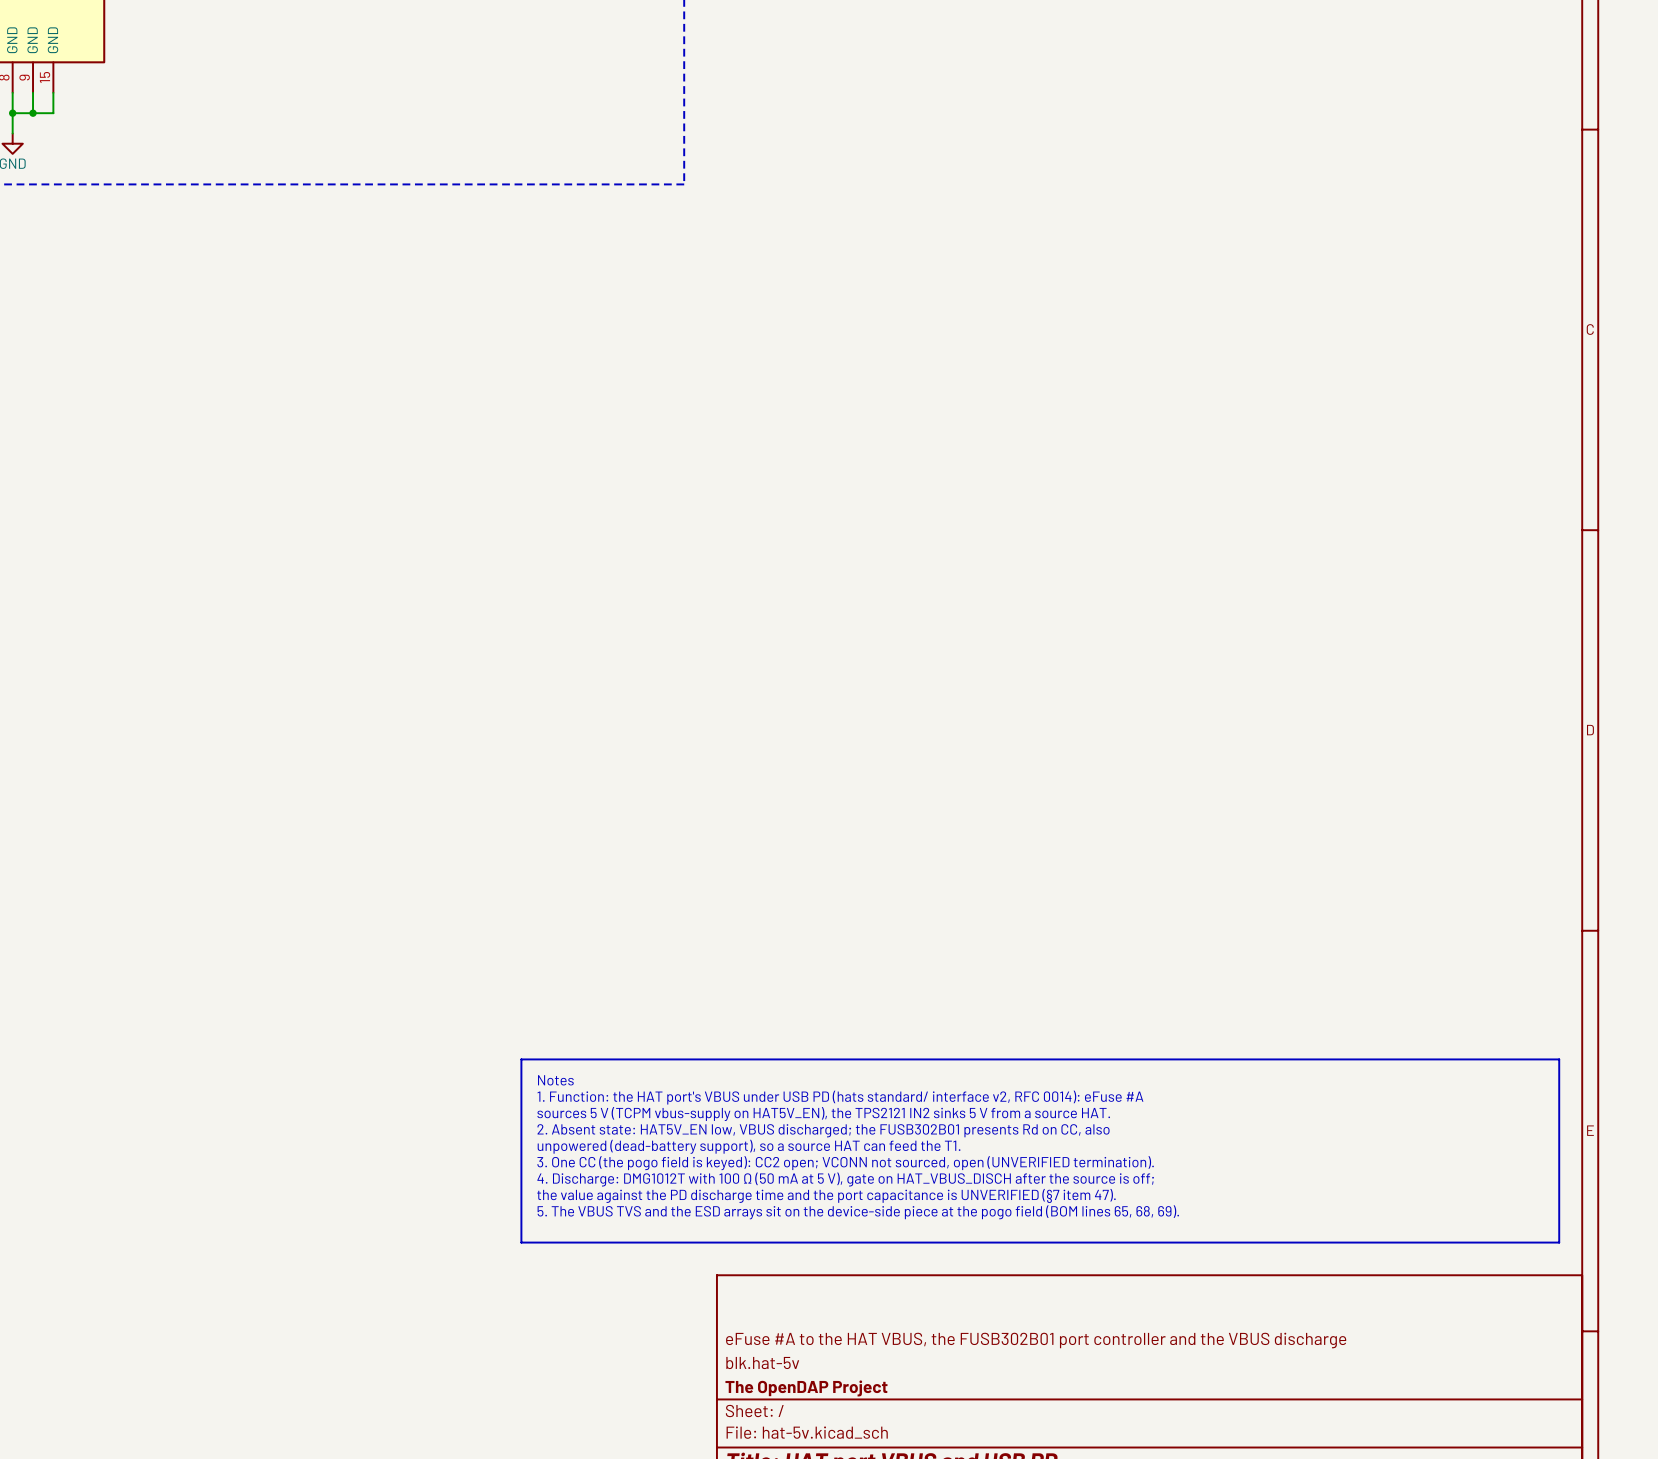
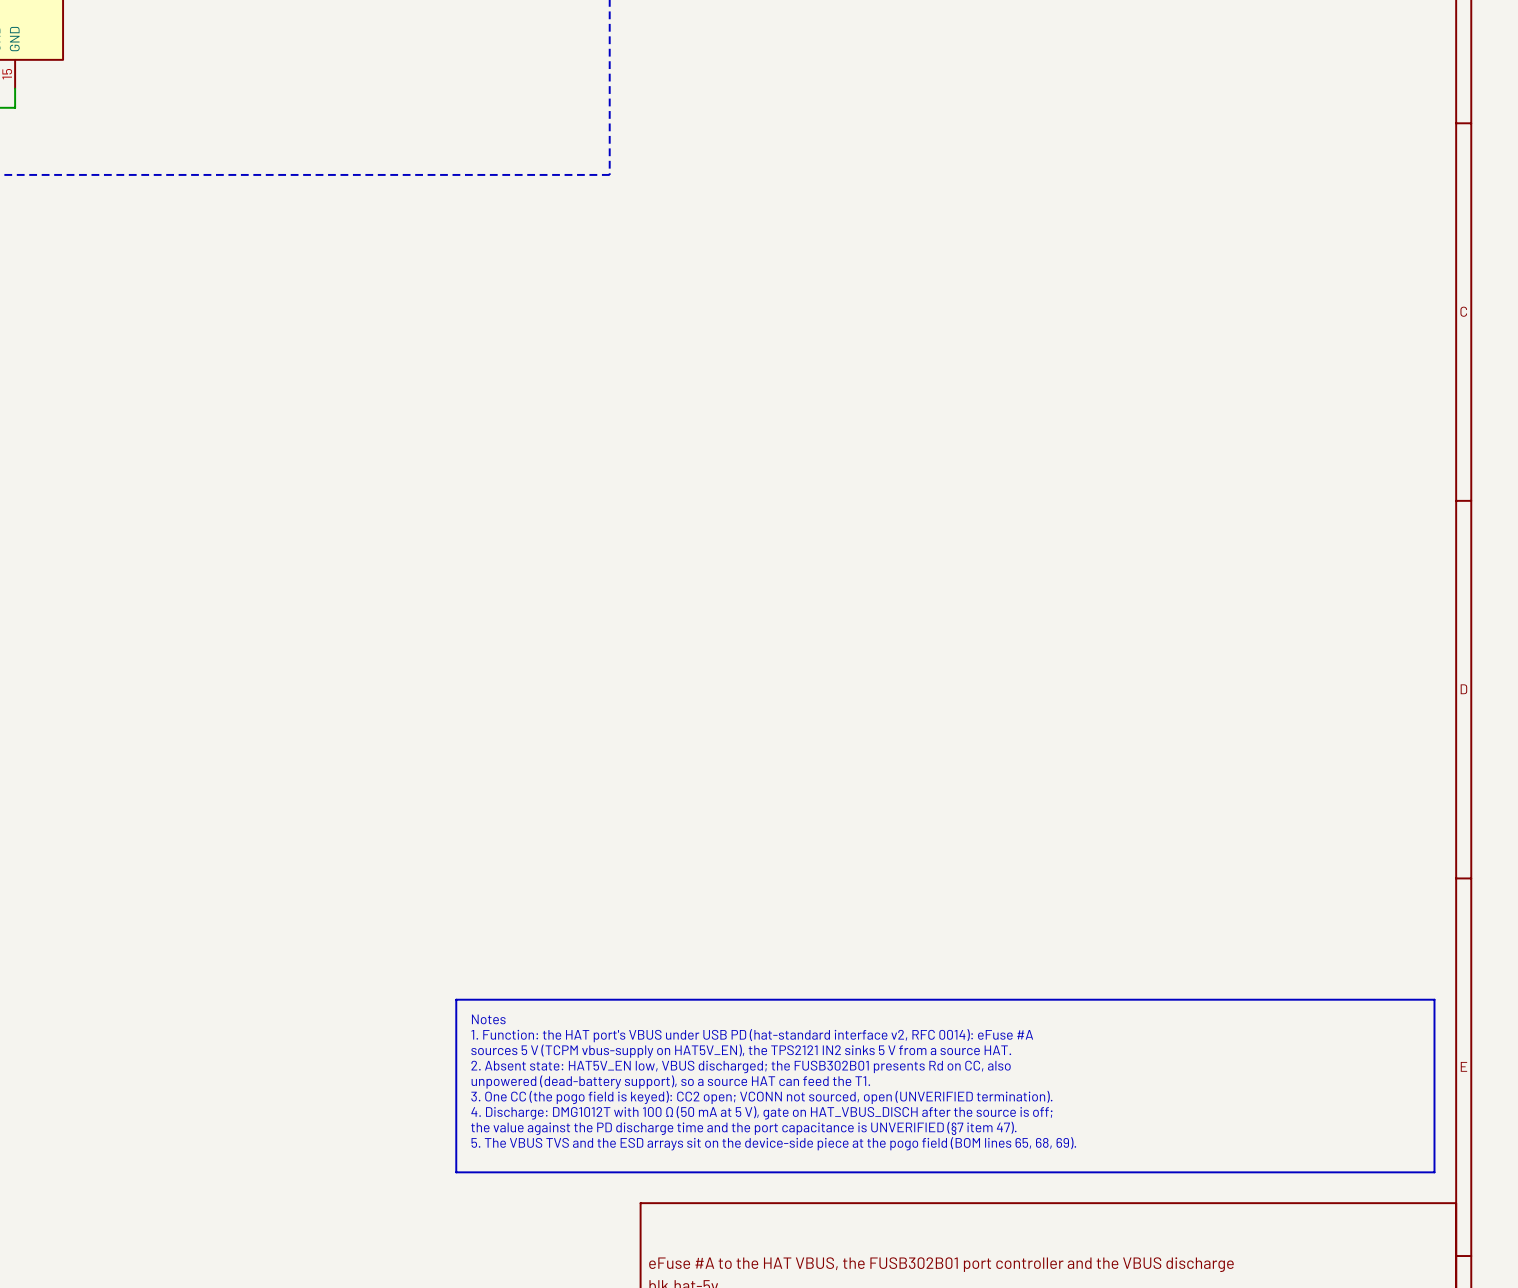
text: 1. Function: the HAT port's VBUS under USB PD (hats standard/ interface v2, RFC 0014): eFuse #A (840, 1097) -> 1. Function: the HAT port's VBUS under USB PD (hat-standard interface v2, RFC 0014): eFuse #A (752, 1035)

